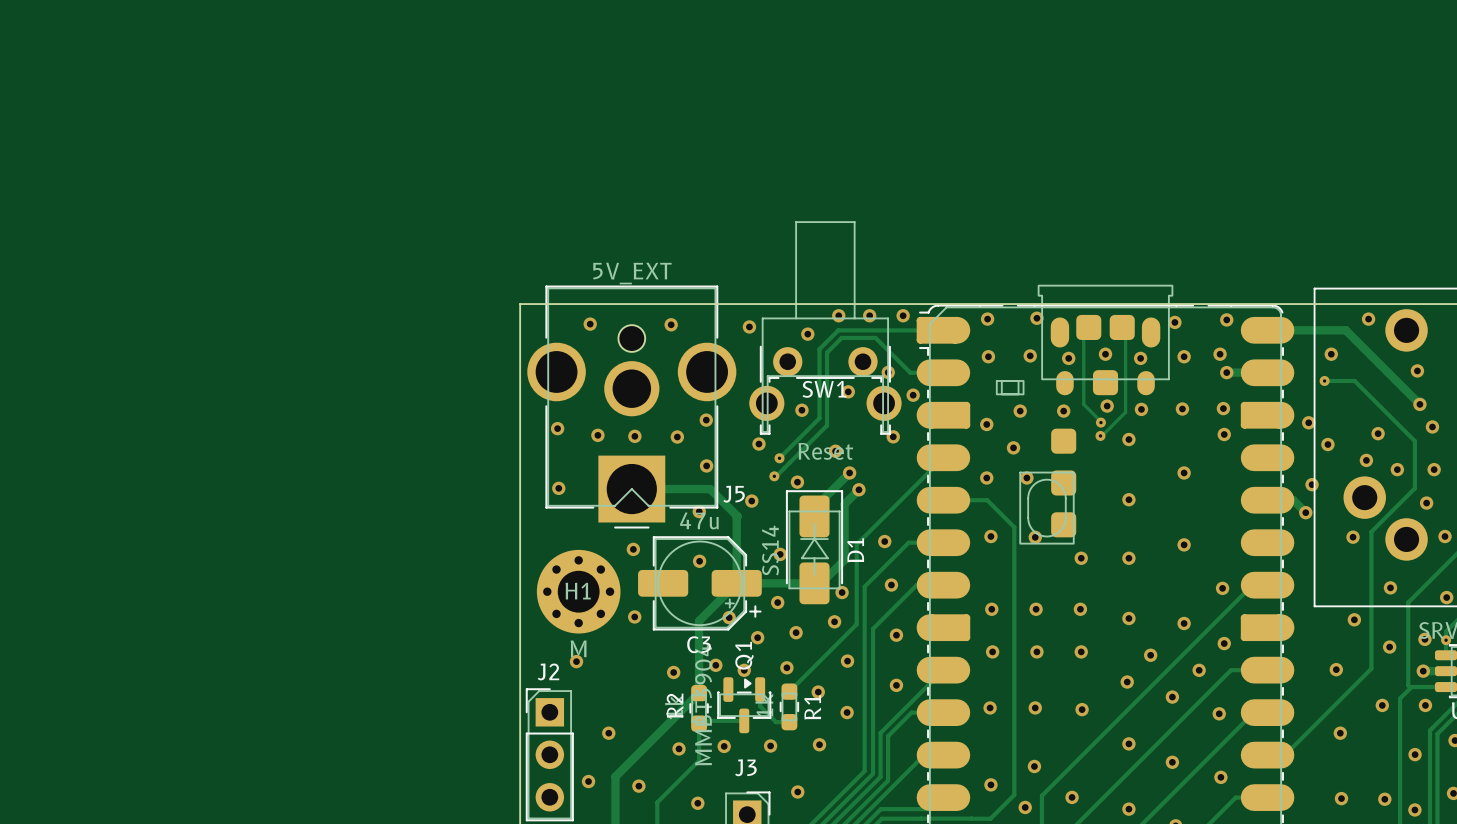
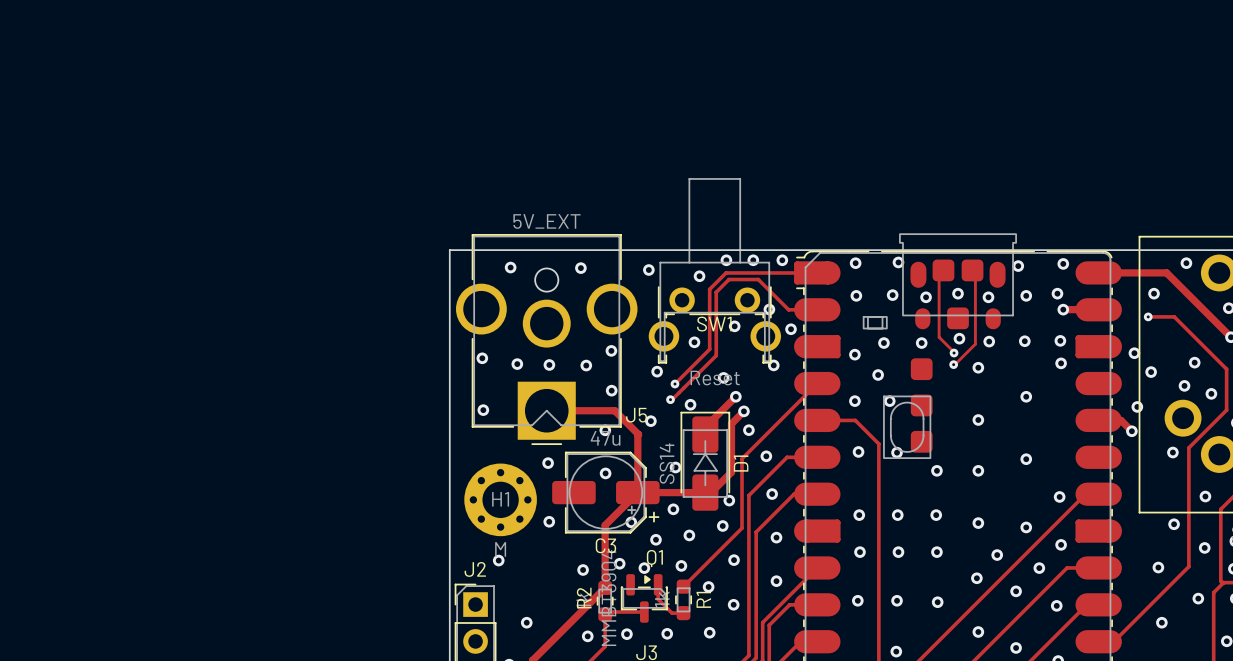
via: none -> (748, 430)
Q1 name rotation: 0° (744, 655) -> 90° clockwise (654, 558)

